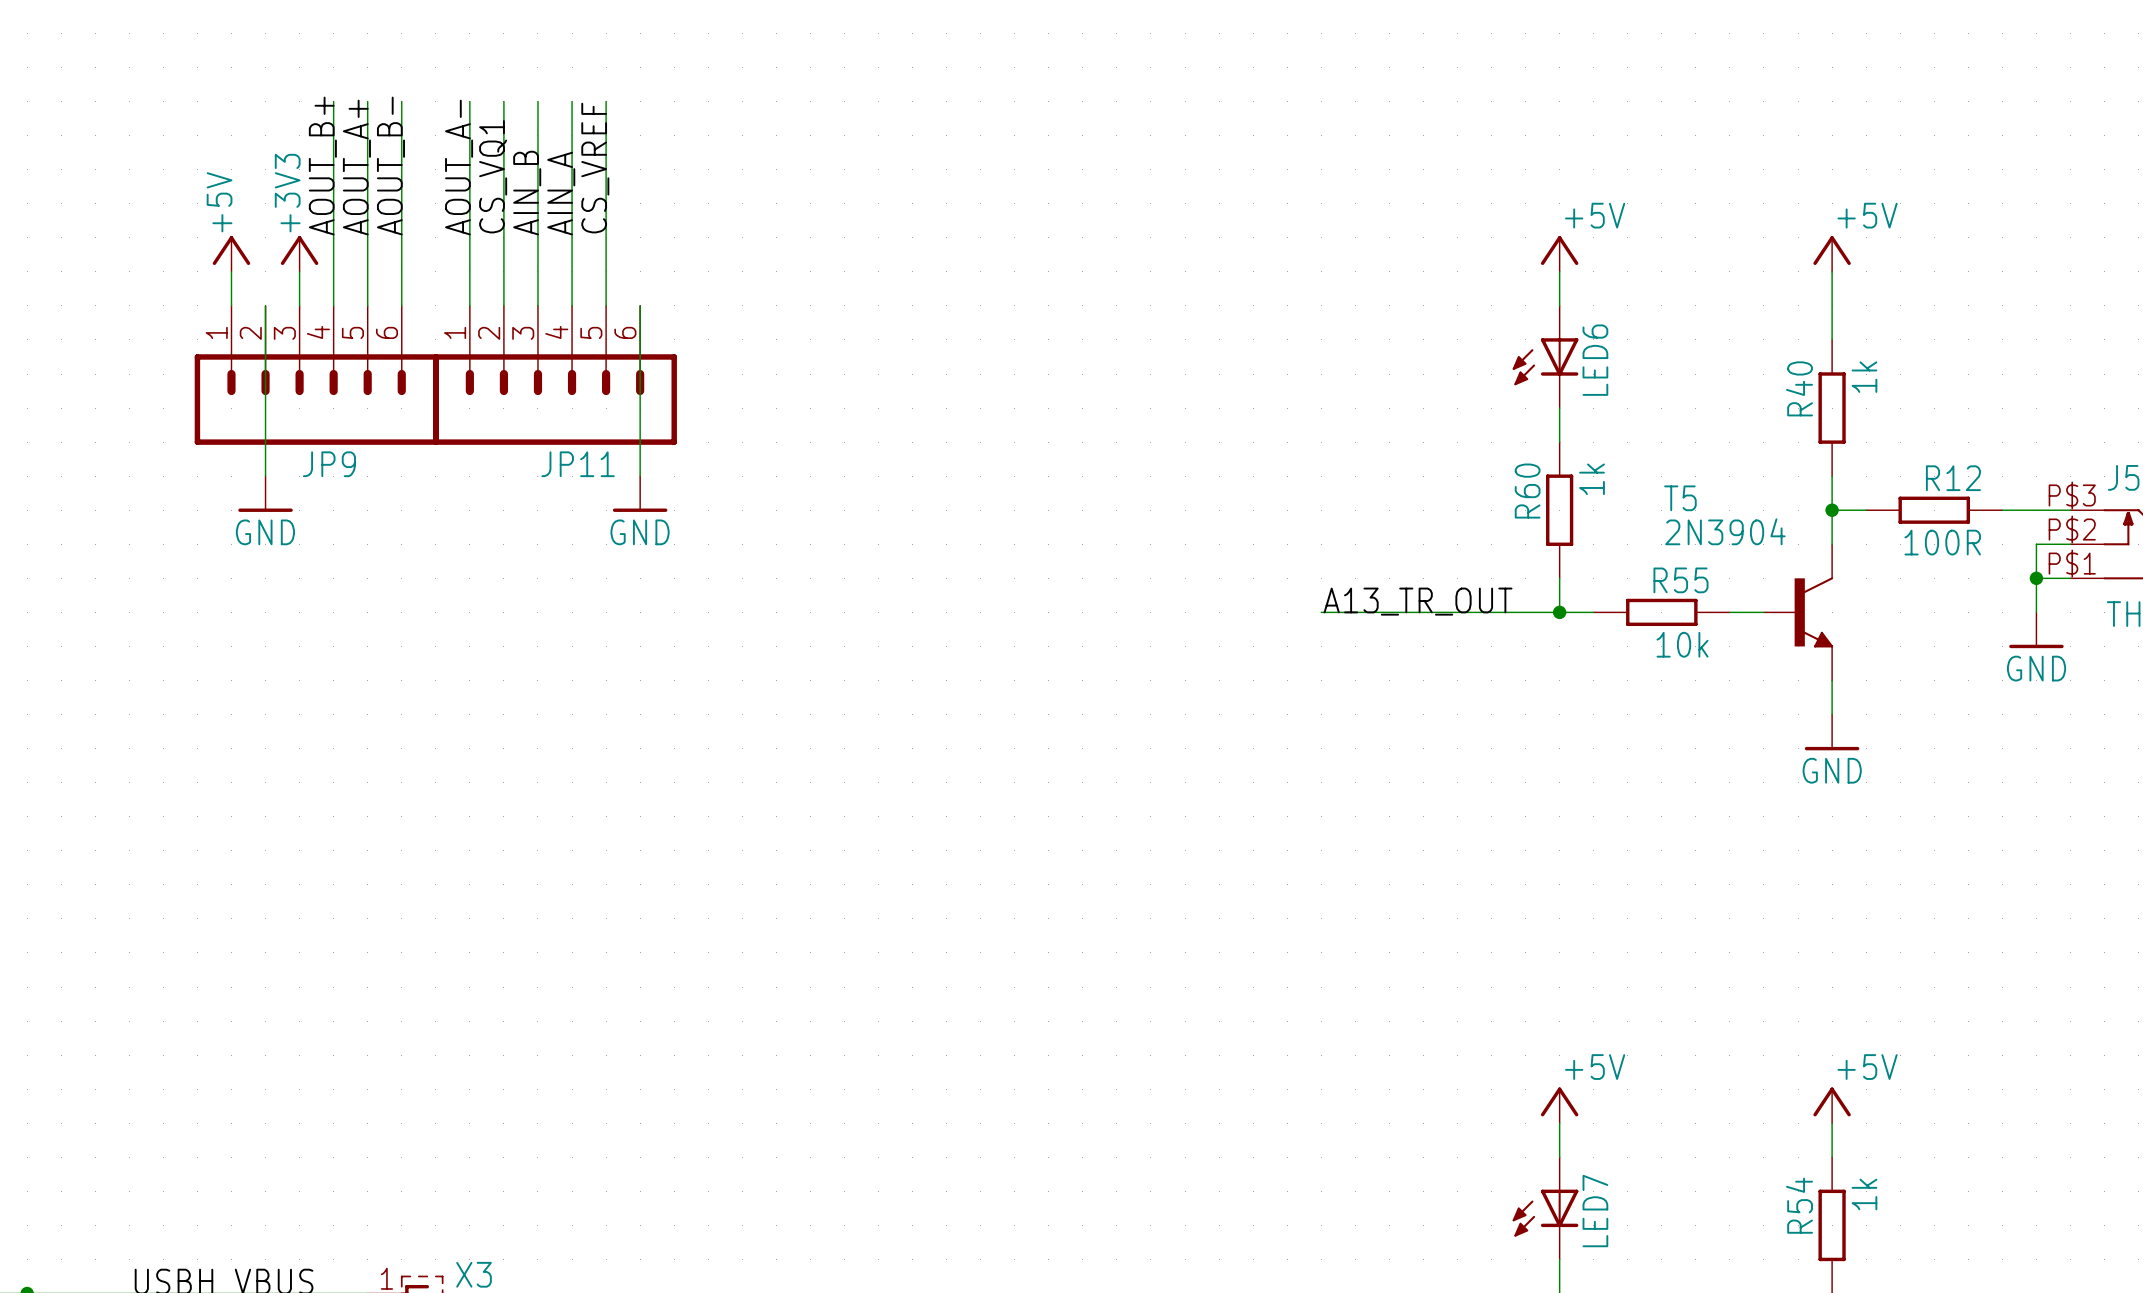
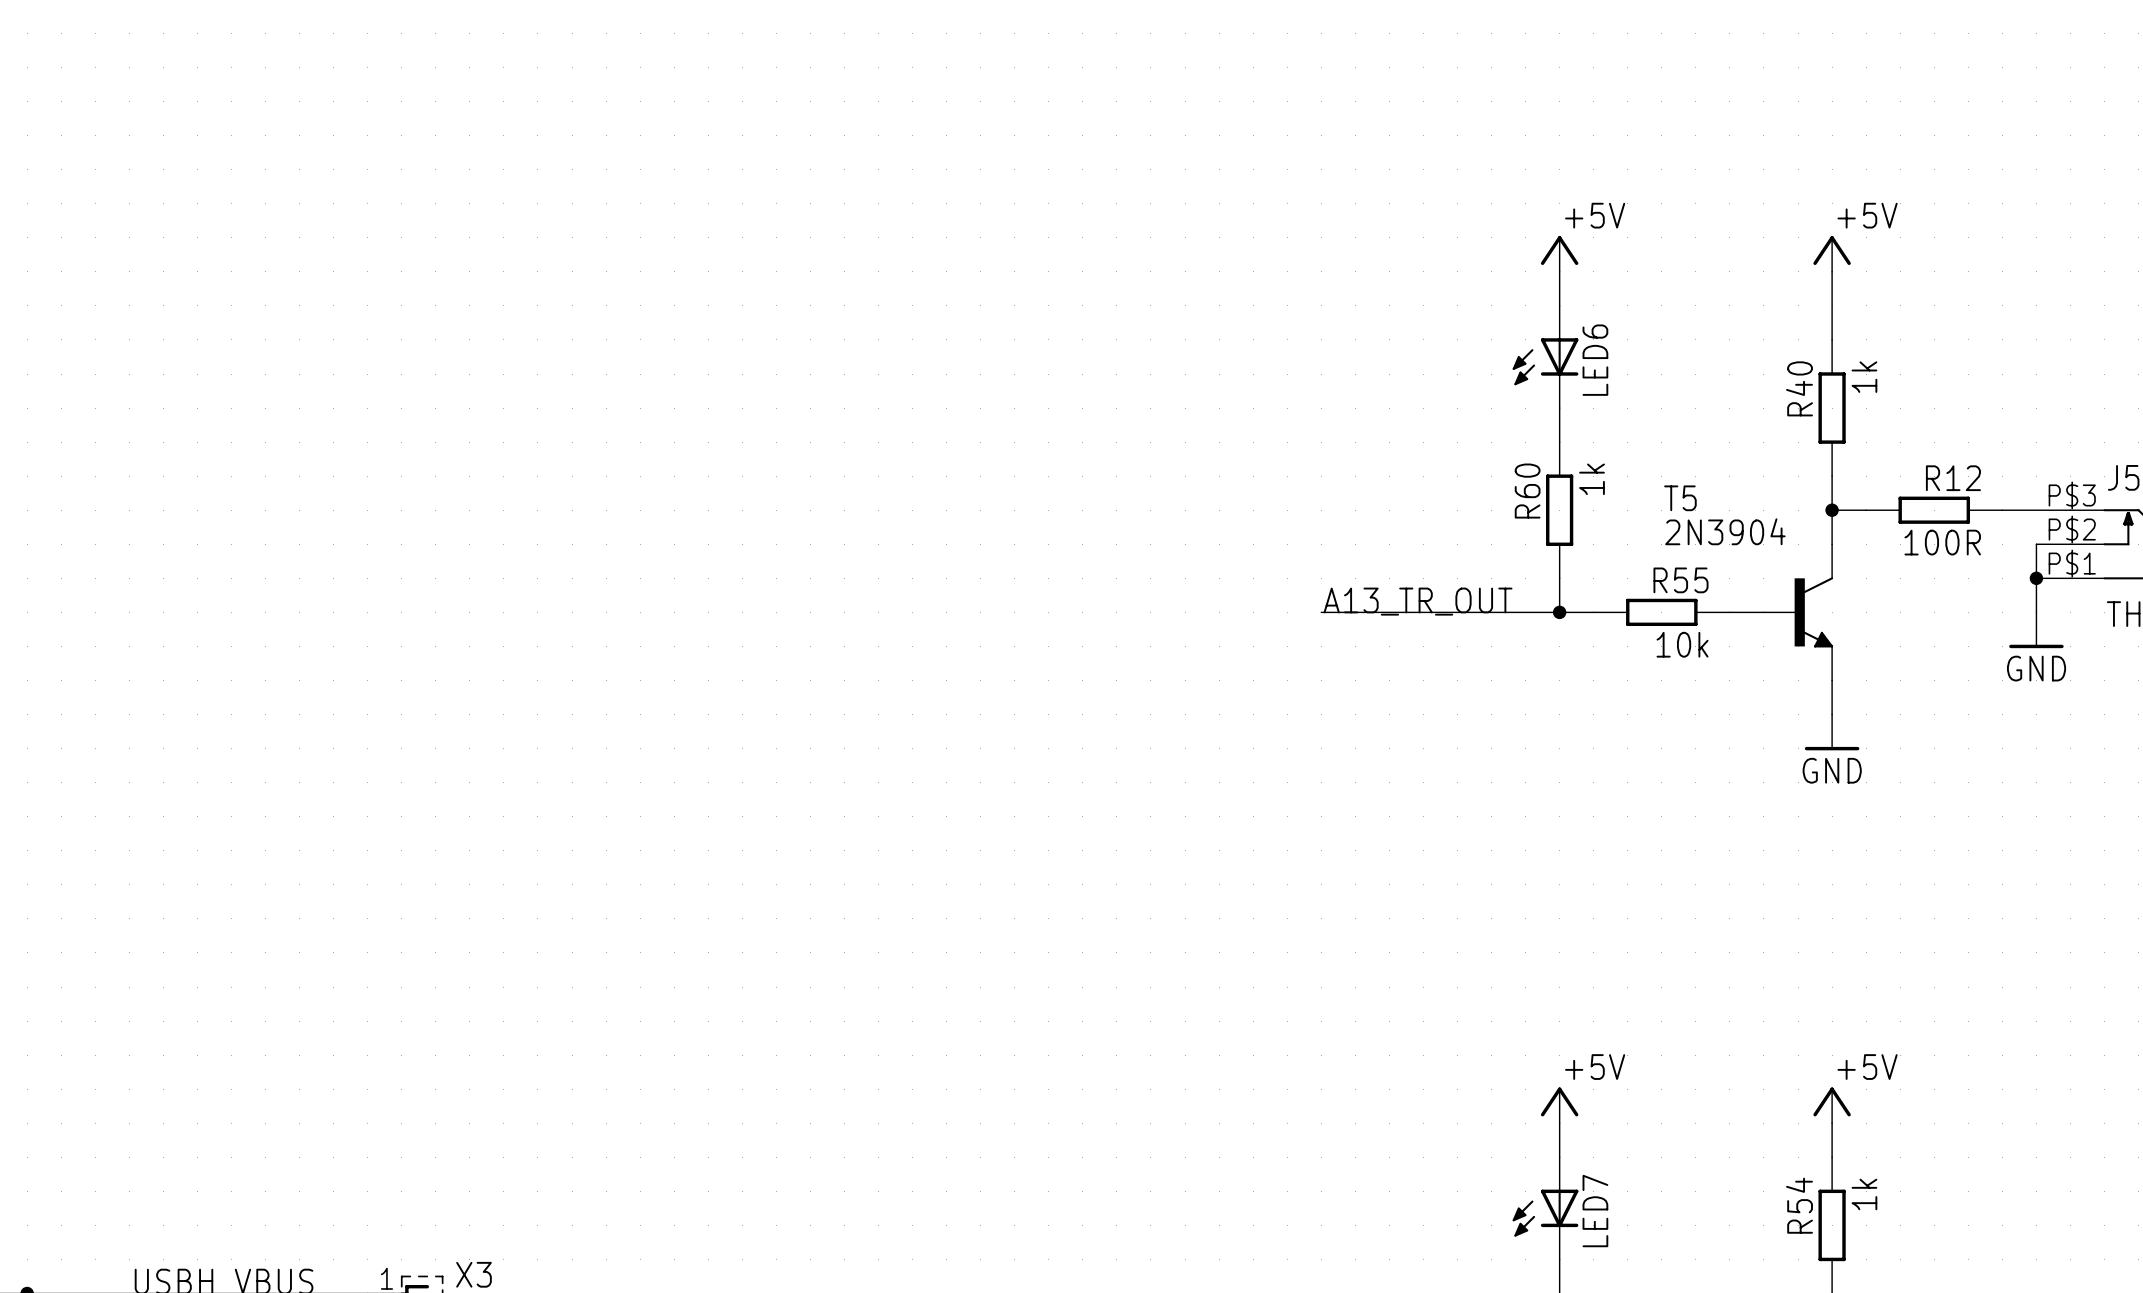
wire: (333, 101) (333, 305) -> none
wire: (367, 101) (367, 305) -> none
wire: (401, 101) (401, 305) -> none
wire: (469, 101) (469, 305) -> none
wire: (503, 101) (503, 305) -> none
wire: (537, 101) (537, 305) -> none
wire: (572, 101) (572, 305) -> none
wire: (606, 101) (606, 305) -> none
label: AOUT_B+ (322, 166) -> none
label: AOUT_B- (390, 166) -> none
label: AOUT_A+ (356, 167) -> none
label: AOUT_A- (459, 167) -> none
label: CS_VREF (595, 168) -> none
label: CS_VQ1 (493, 176) -> none
label: AIN_B (527, 193) -> none
label: AIN_A (561, 193) -> none
power symbol: +5V (231, 253) -> none
power symbol: +3V3 (299, 253) -> none
wire: (231, 271) (231, 305) -> none
wire: (299, 271) (299, 305) -> none
wire: (265, 305) (265, 476) -> none
wire: (640, 305) (640, 476) -> none
JP9: (316, 375) -> none
JP11: (555, 375) -> none
power symbol: GND (265, 494) -> none
power symbol: GND (640, 494) -> none

